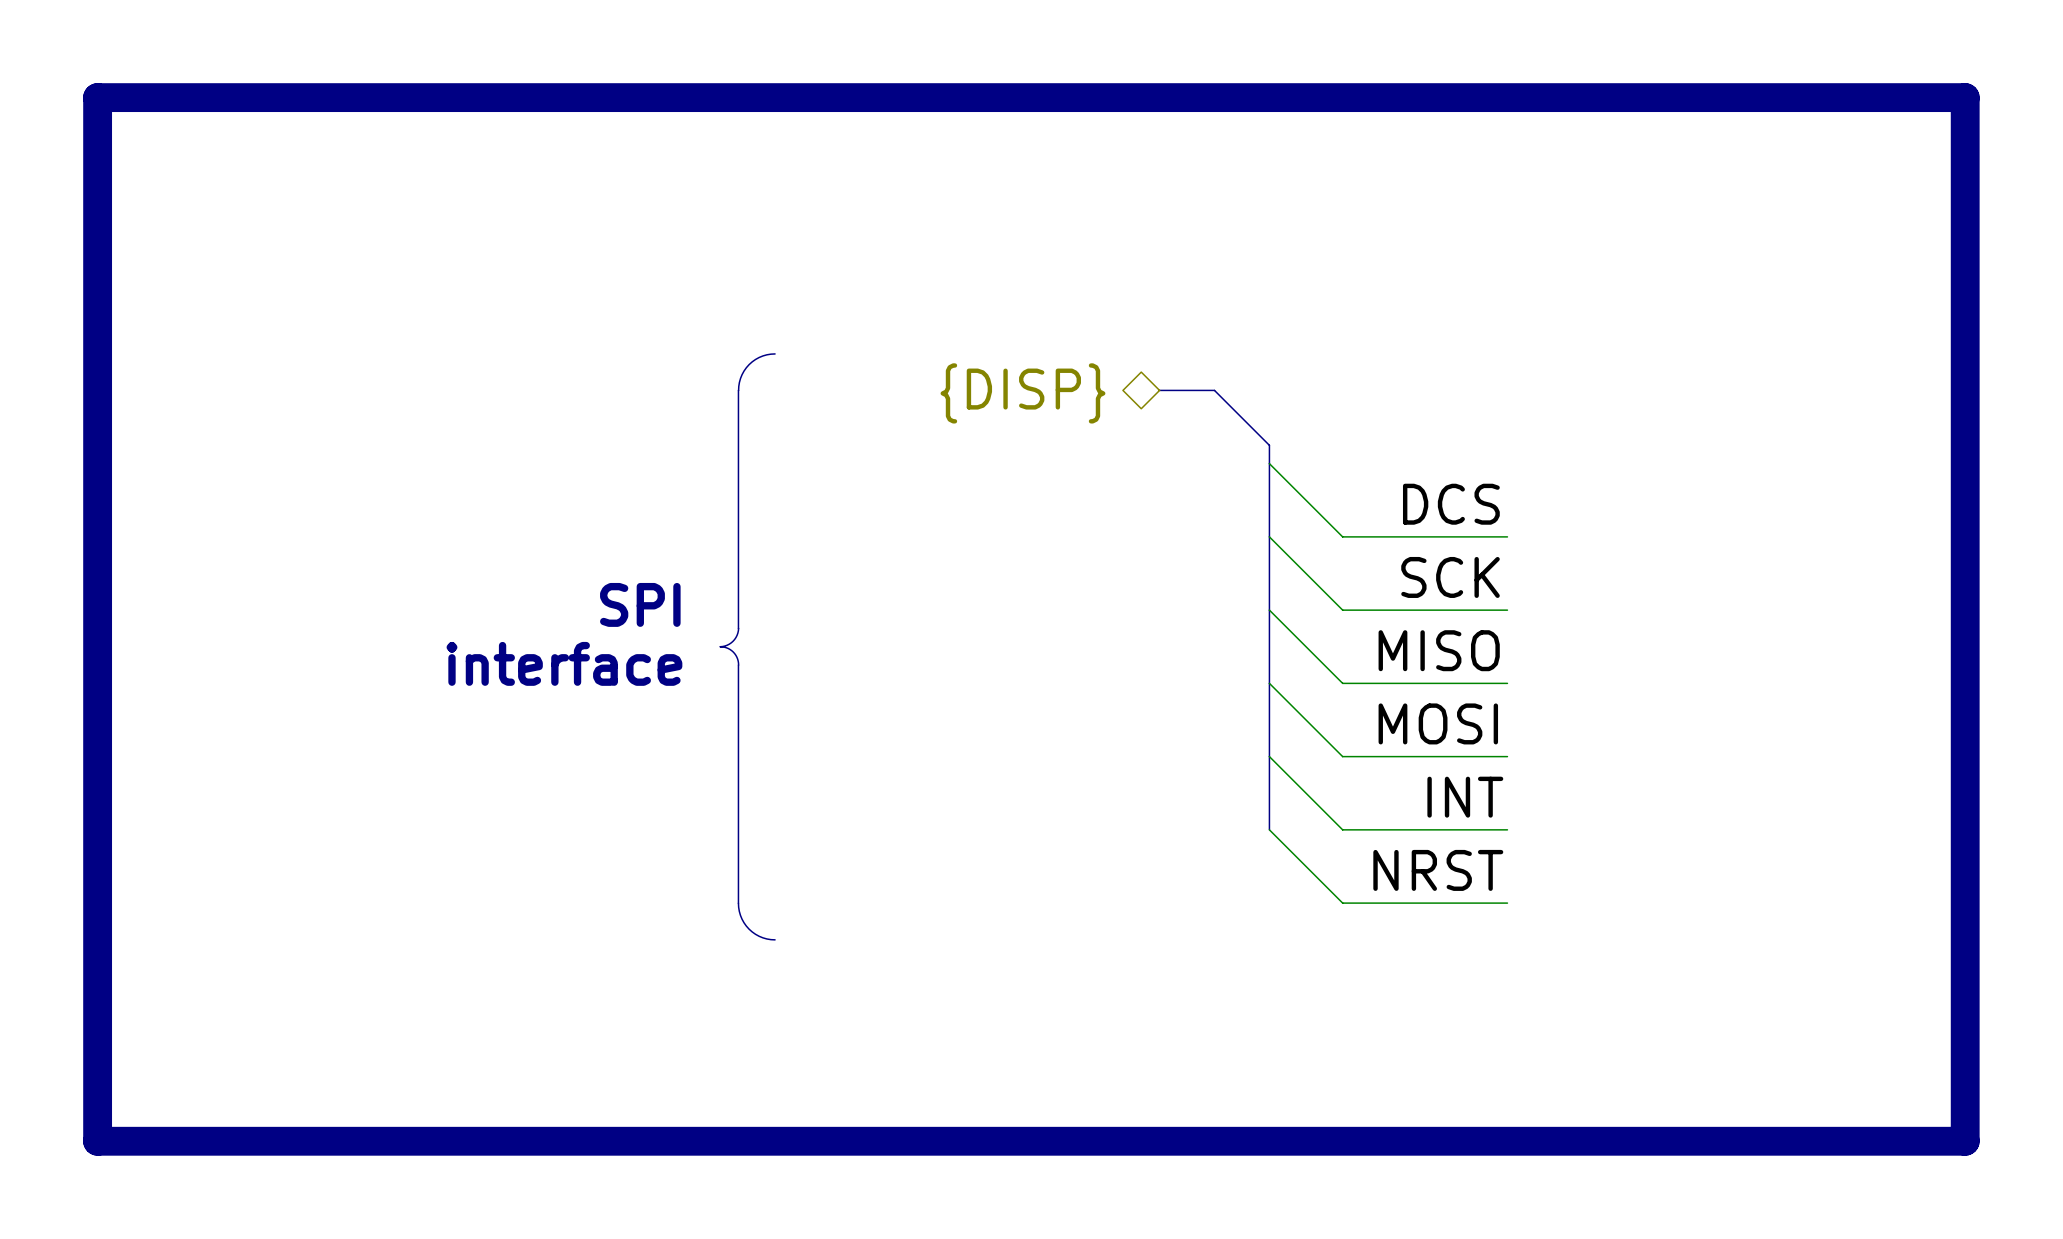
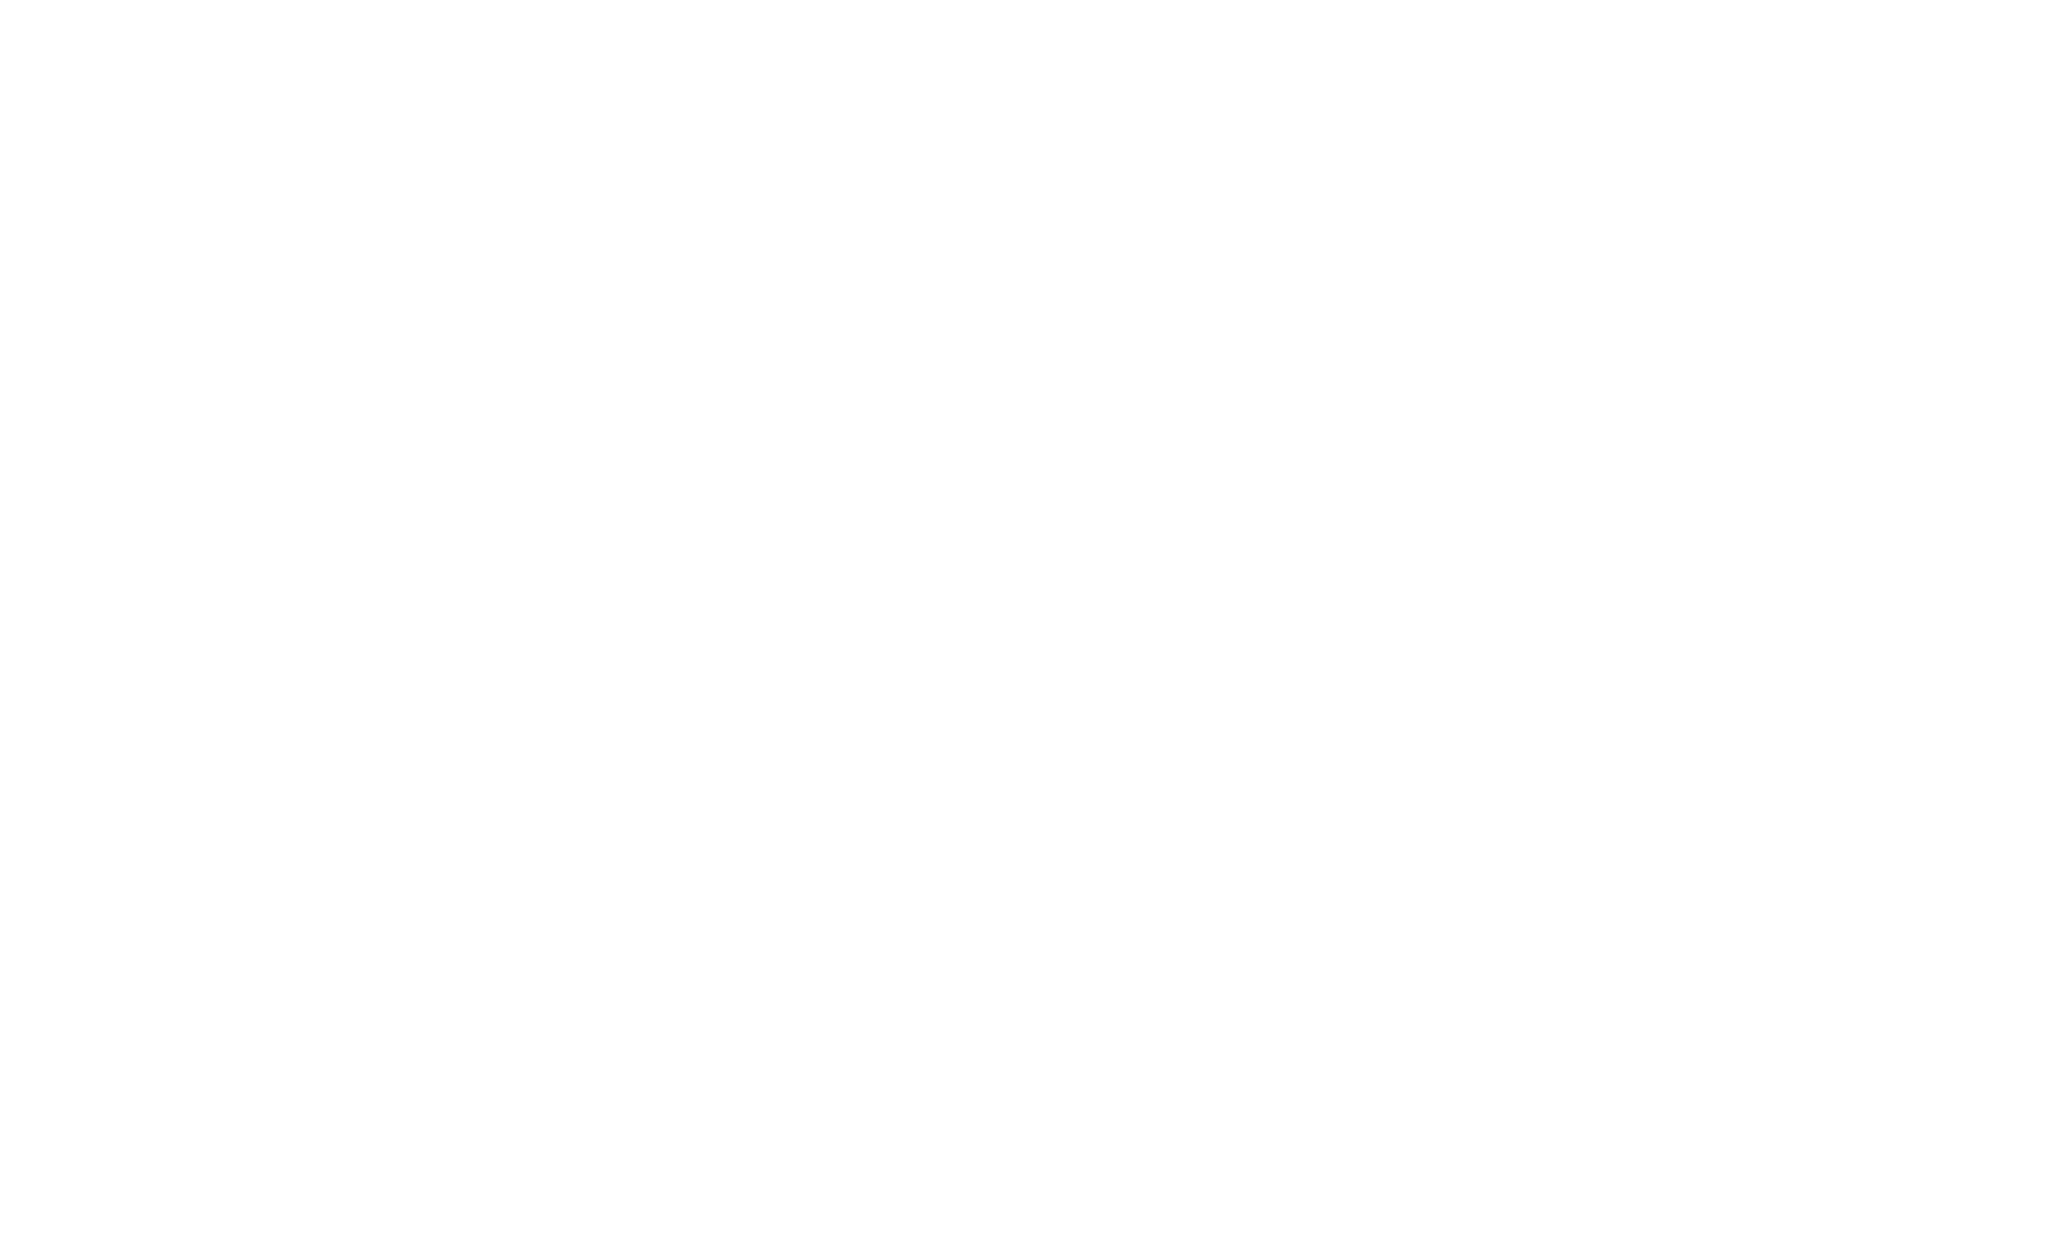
line: (97, 97) (1965, 97) (1965, 1141) (97, 1141) (97, 97) -> none
line: (775, 353) (762, 355) (749, 364) (742, 374) (738, 390) -> none
line: (738, 390) (738, 630) (733, 641) (720, 646) (731, 650) (738, 663) (739, 911) (744, 922) (752, 931) (762, 937) (775, 939) -> none
bus: (1159, 390) (1214, 390) (1269, 445) (1269, 829) -> none
hierarchical label: {DISP} (1022, 393) -> none
wire: (1269, 463) (1342, 536) -> none
label: DCS (1451, 504) -> none
wire: (1269, 536) (1342, 610) -> none
wire: (1342, 536) (1507, 536) -> none
label: SCK (1450, 577) -> none
text: SPI (640, 604) -> none
wire: (1269, 610) (1342, 683) -> none
wire: (1342, 610) (1507, 610) -> none
label: MISO (1439, 650) -> none
text: interface (564, 663) -> none
wire: (1269, 683) (1342, 756) -> none
wire: (1342, 683) (1507, 683) -> none
label: MOSI (1438, 723) -> none
wire: (1269, 756) (1342, 829) -> none
wire: (1342, 756) (1507, 756) -> none
label: INT (1465, 797) -> none
wire: (1269, 829) (1342, 903) -> none
wire: (1342, 829) (1507, 829) -> none
label: NRST (1438, 870) -> none
wire: (1342, 903) (1507, 903) -> none

